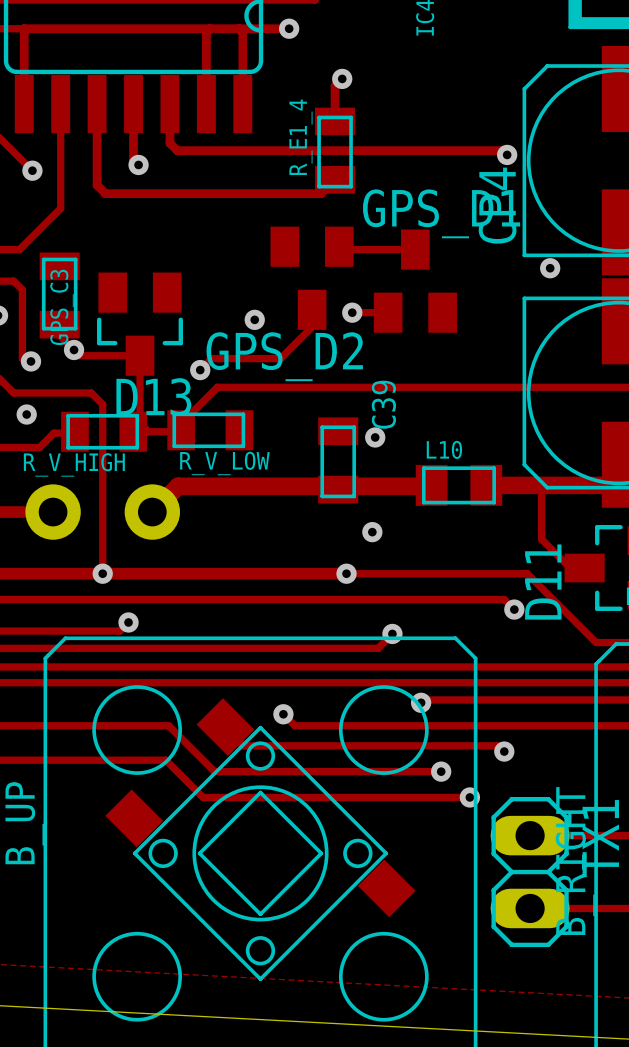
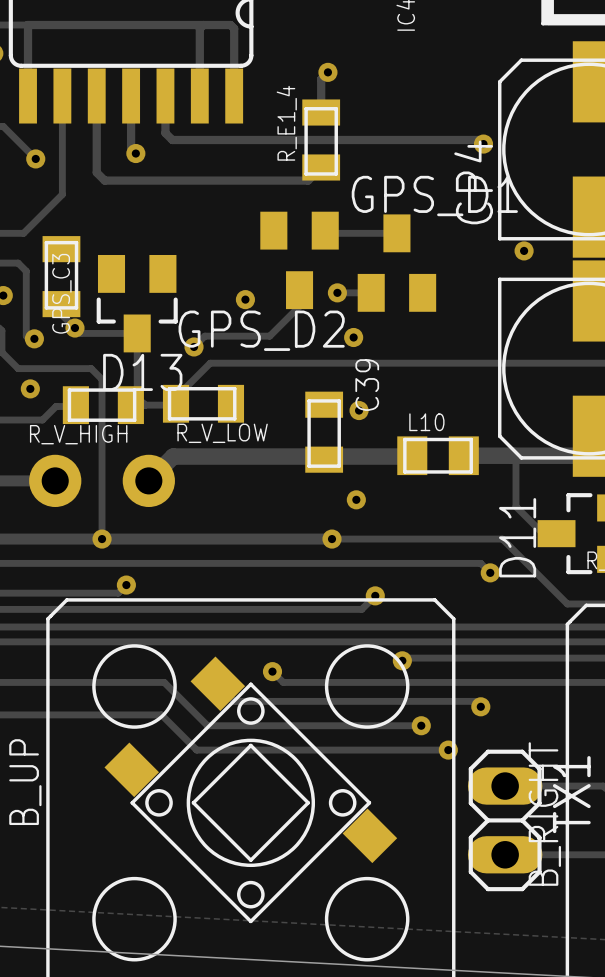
track: (238, 28) (289, 28) -> none
via: (289, 28) -> none
via: none -> (353, 337)

